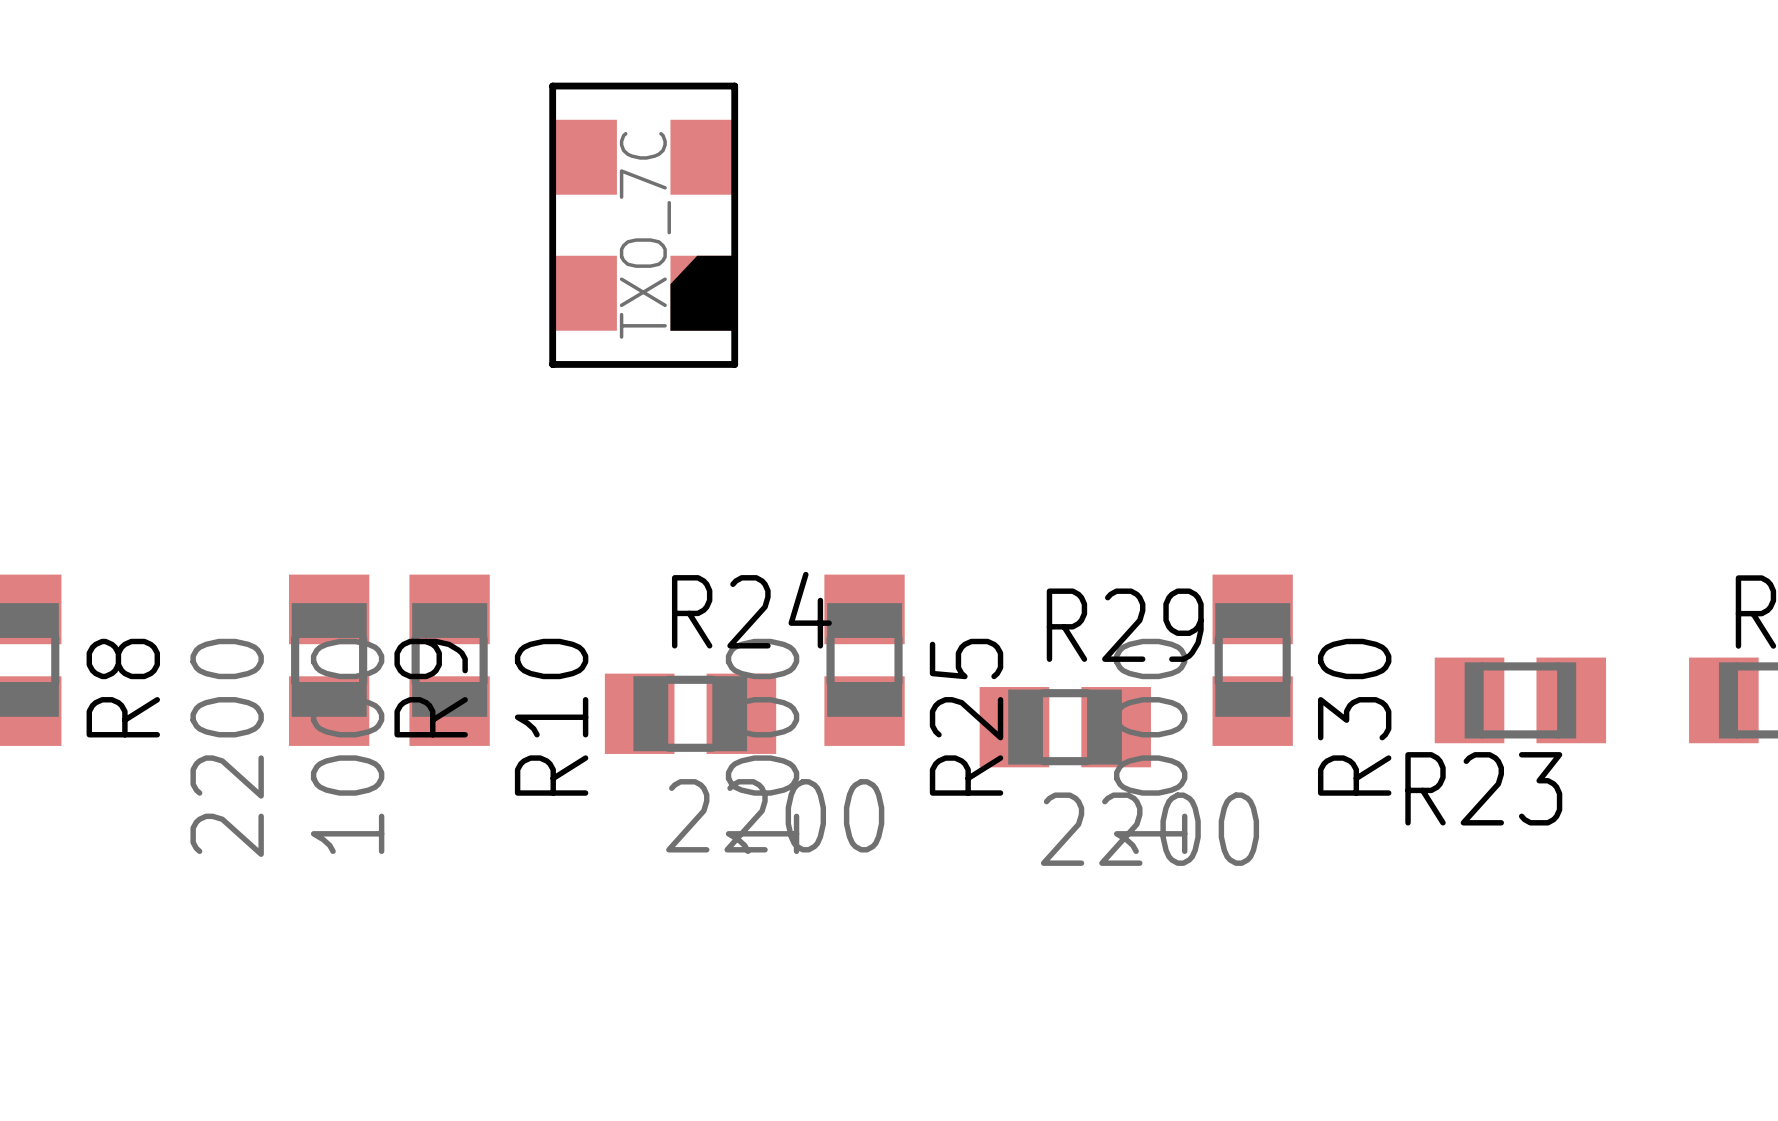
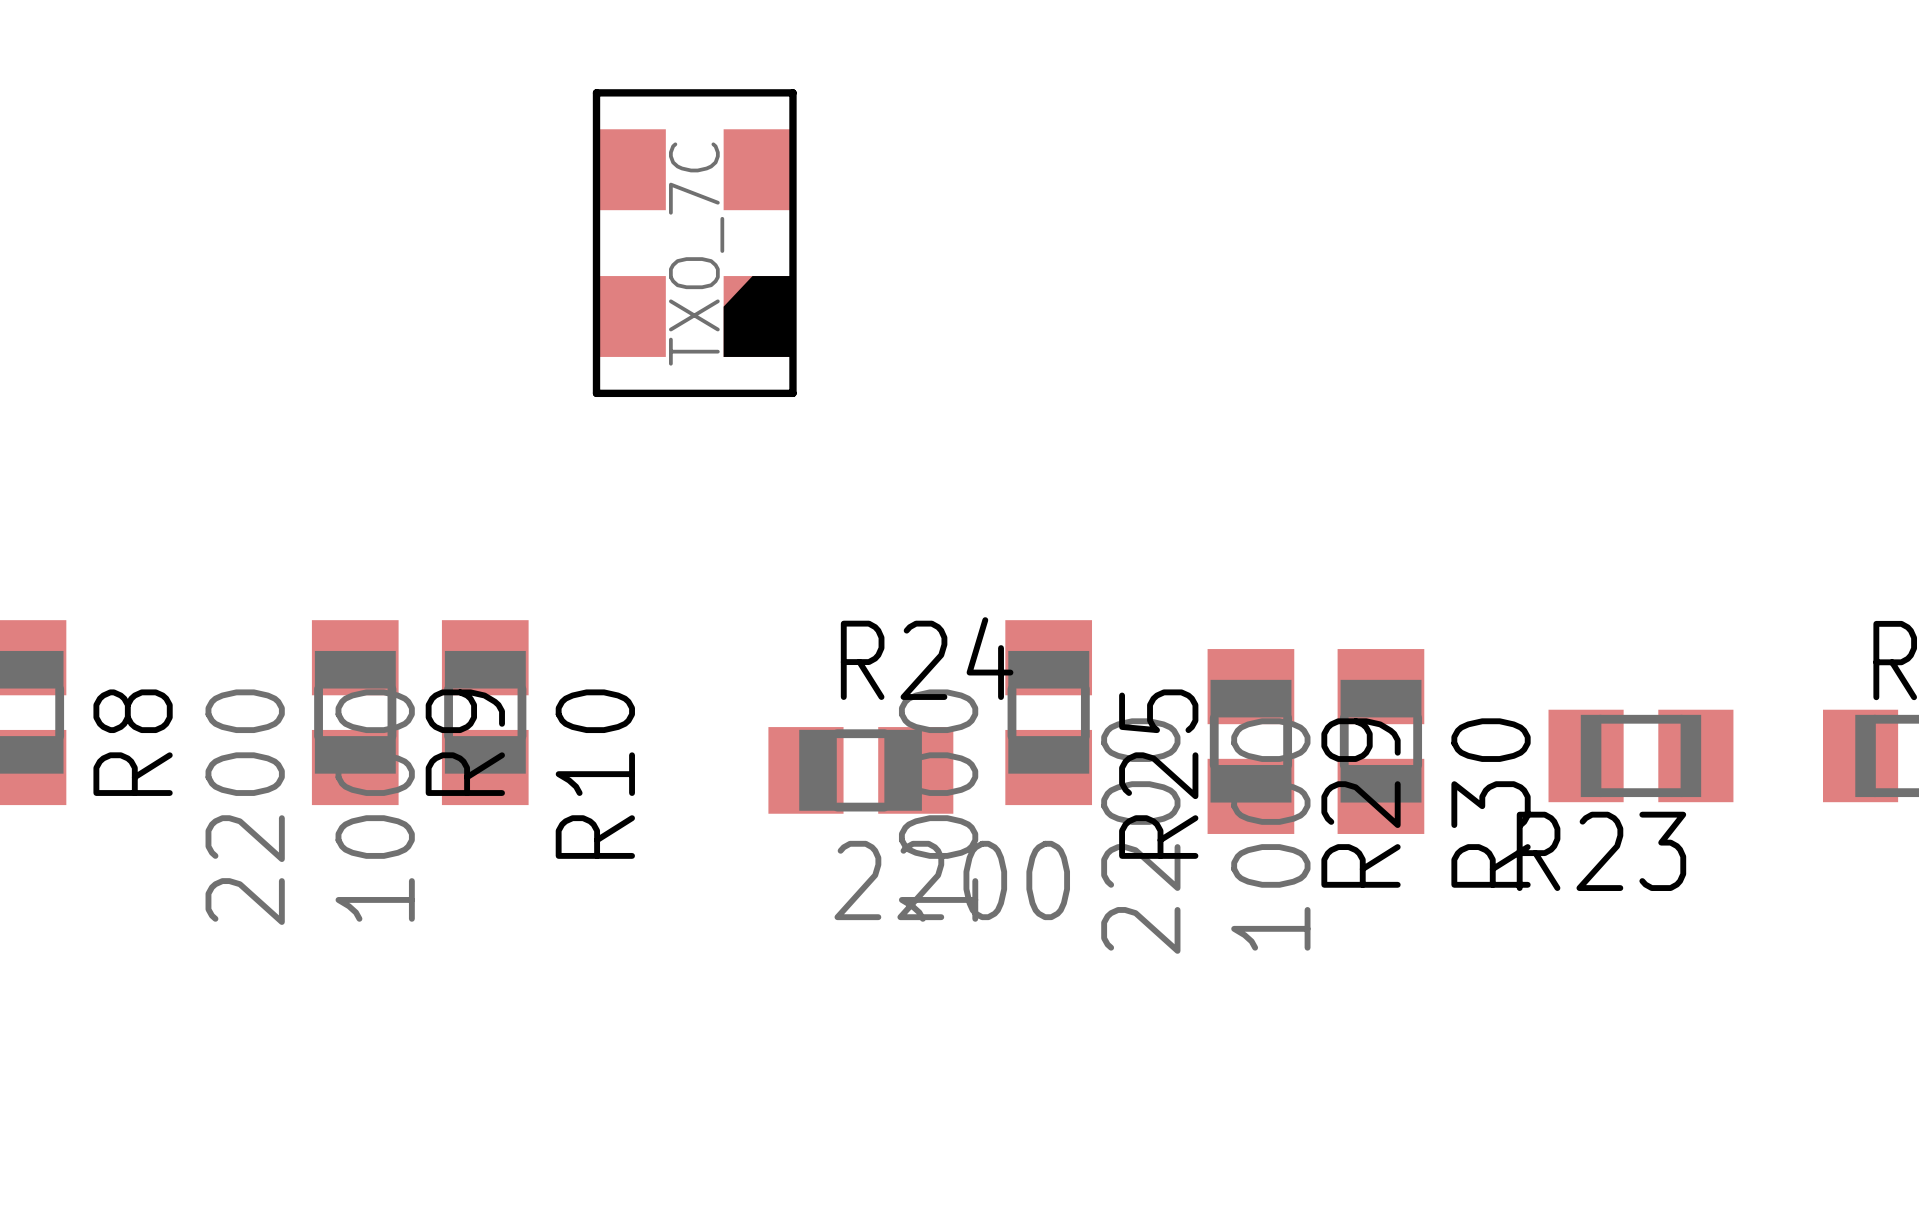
R25 position: (864, 660) -> (1048, 712)
R30 position: (1252, 660) -> (1380, 741)
R24 position: (690, 713) -> (860, 770)
R29 rotation: 0° (1065, 727) -> 90° clockwise (1250, 741)

